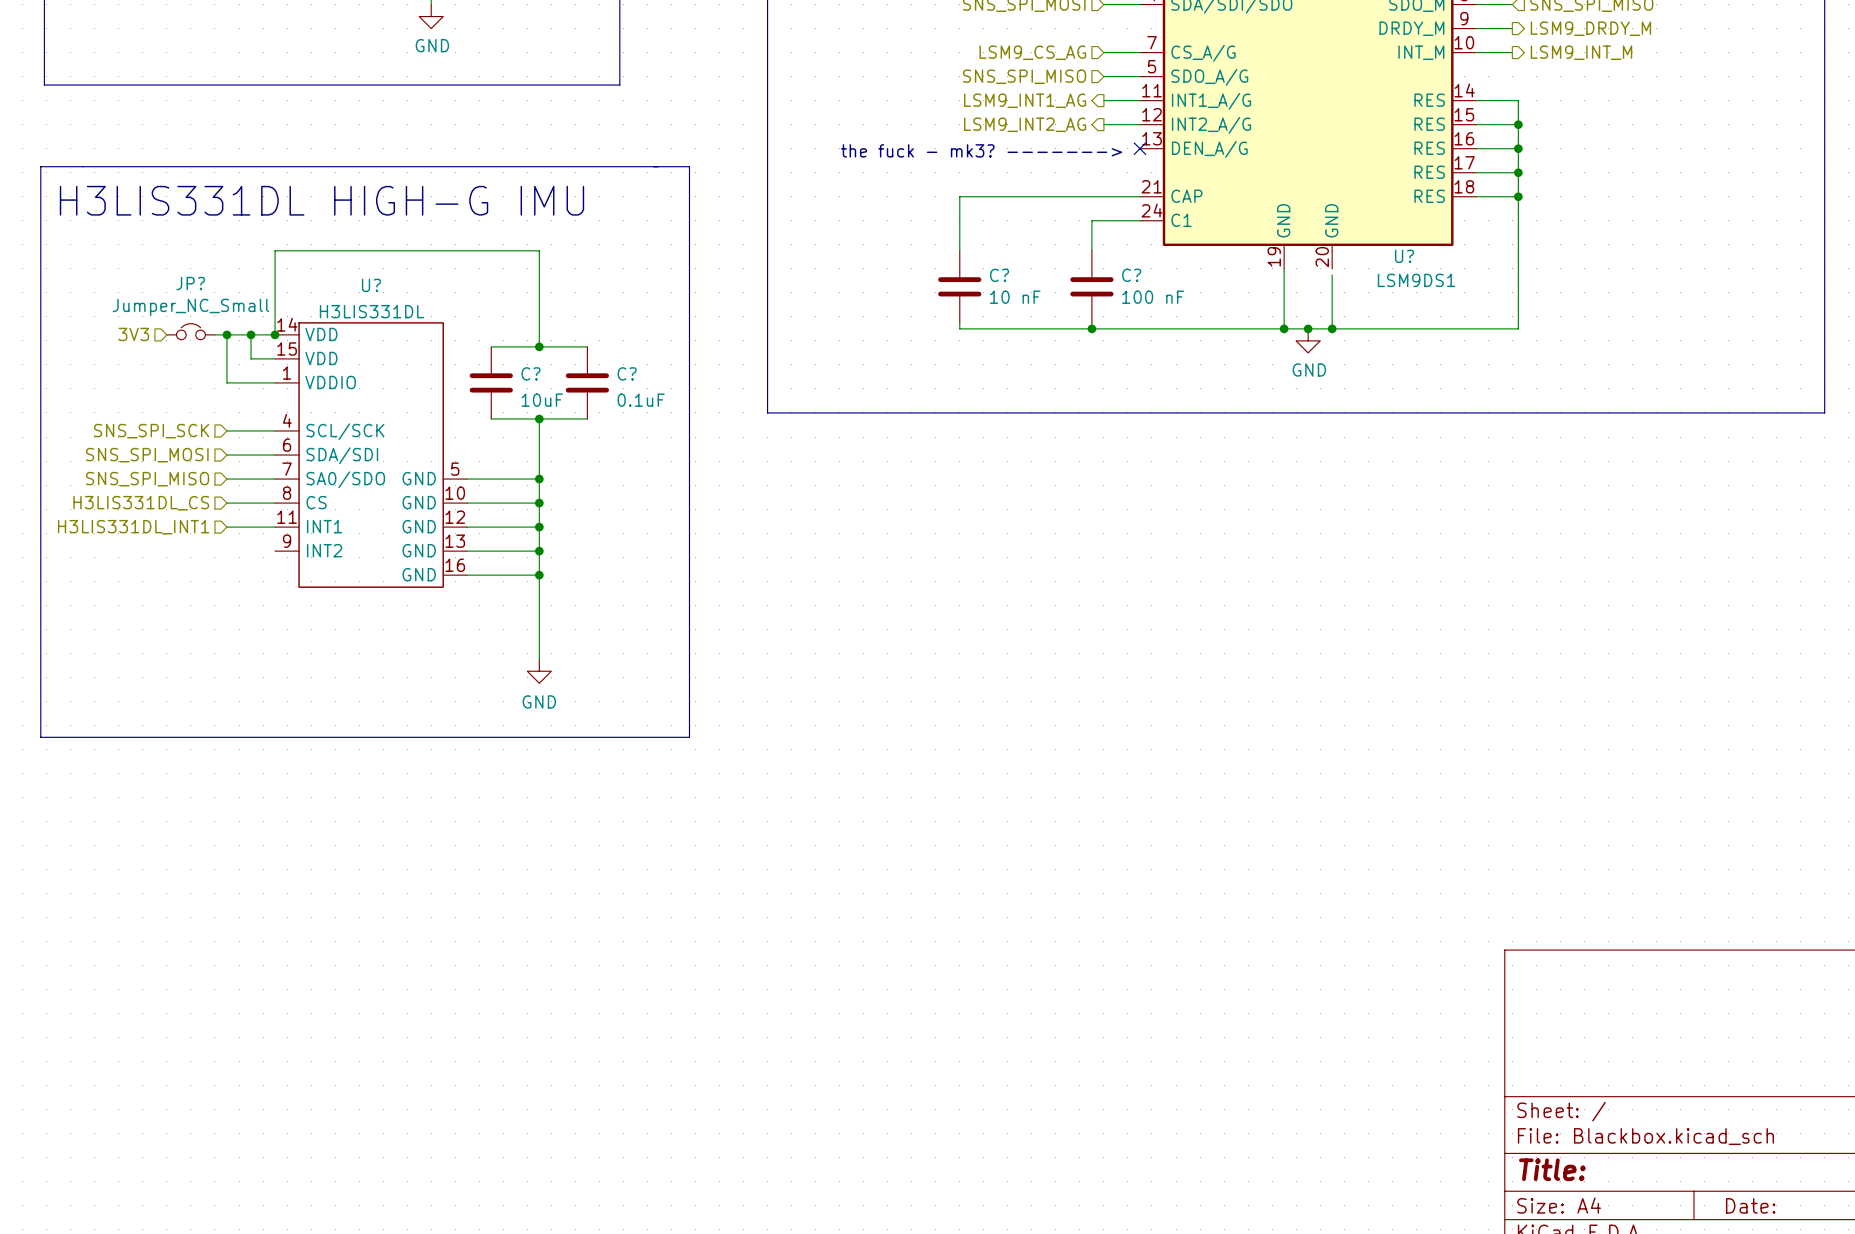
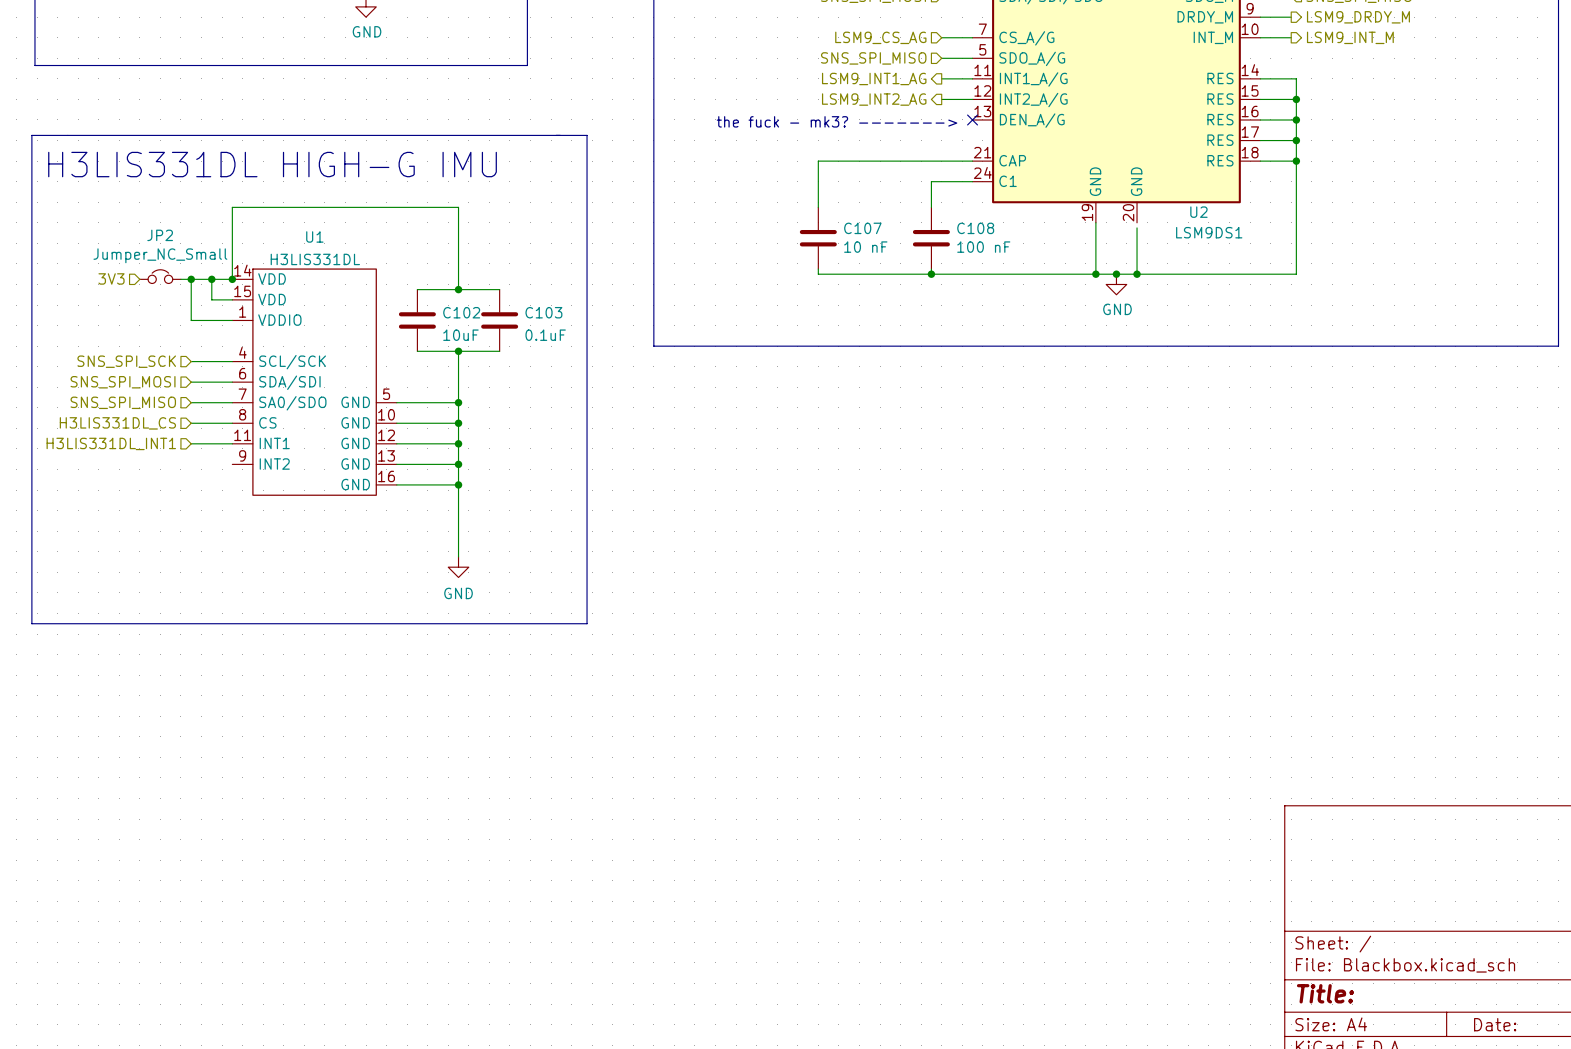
U? name: U? (1404, 256) -> U2 (1198, 212)
C? name: C? (999, 275) -> C107 (862, 228)
C? name: C? (1131, 275) -> C108 (975, 228)
JP? name: JP? (190, 283) -> JP2 (160, 235)
U? name: U? (371, 285) -> U1 (314, 236)
C? name: C? (531, 373) -> C102 (461, 312)
C? name: C? (627, 373) -> C103 (543, 312)

